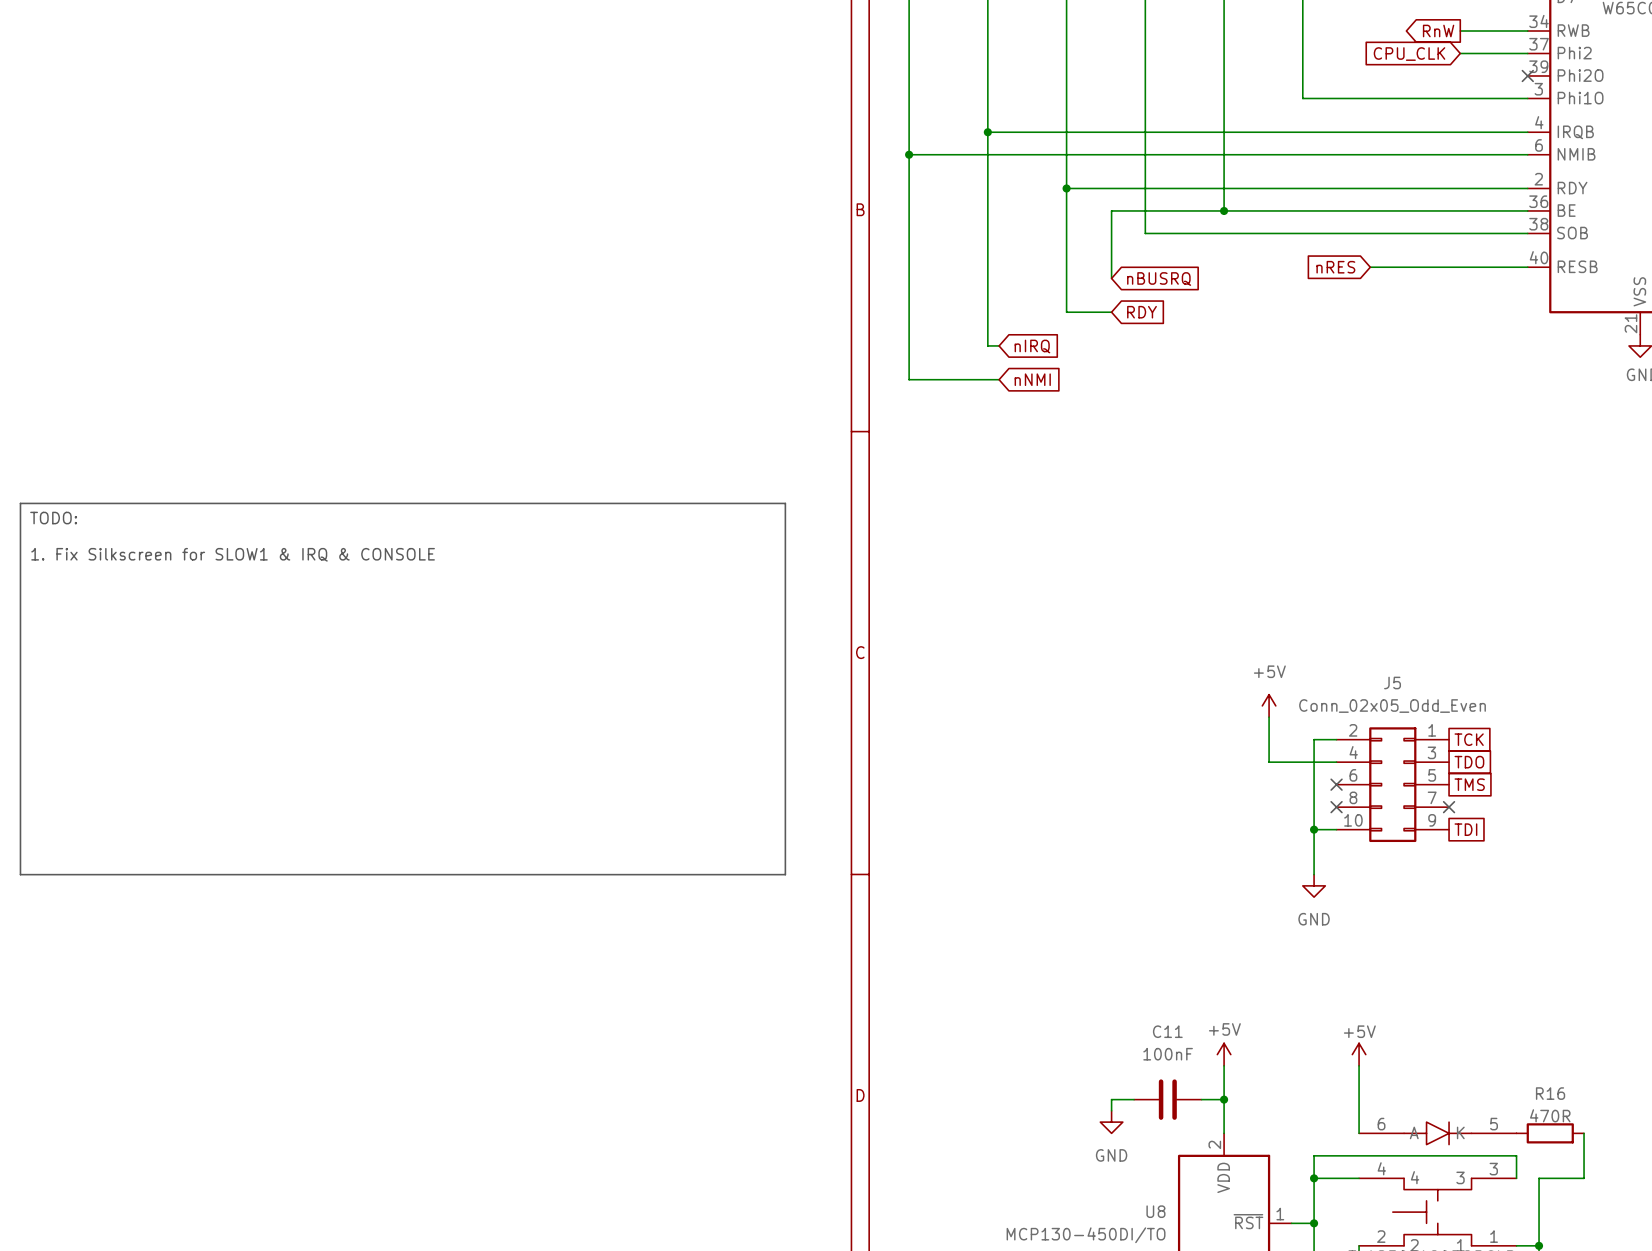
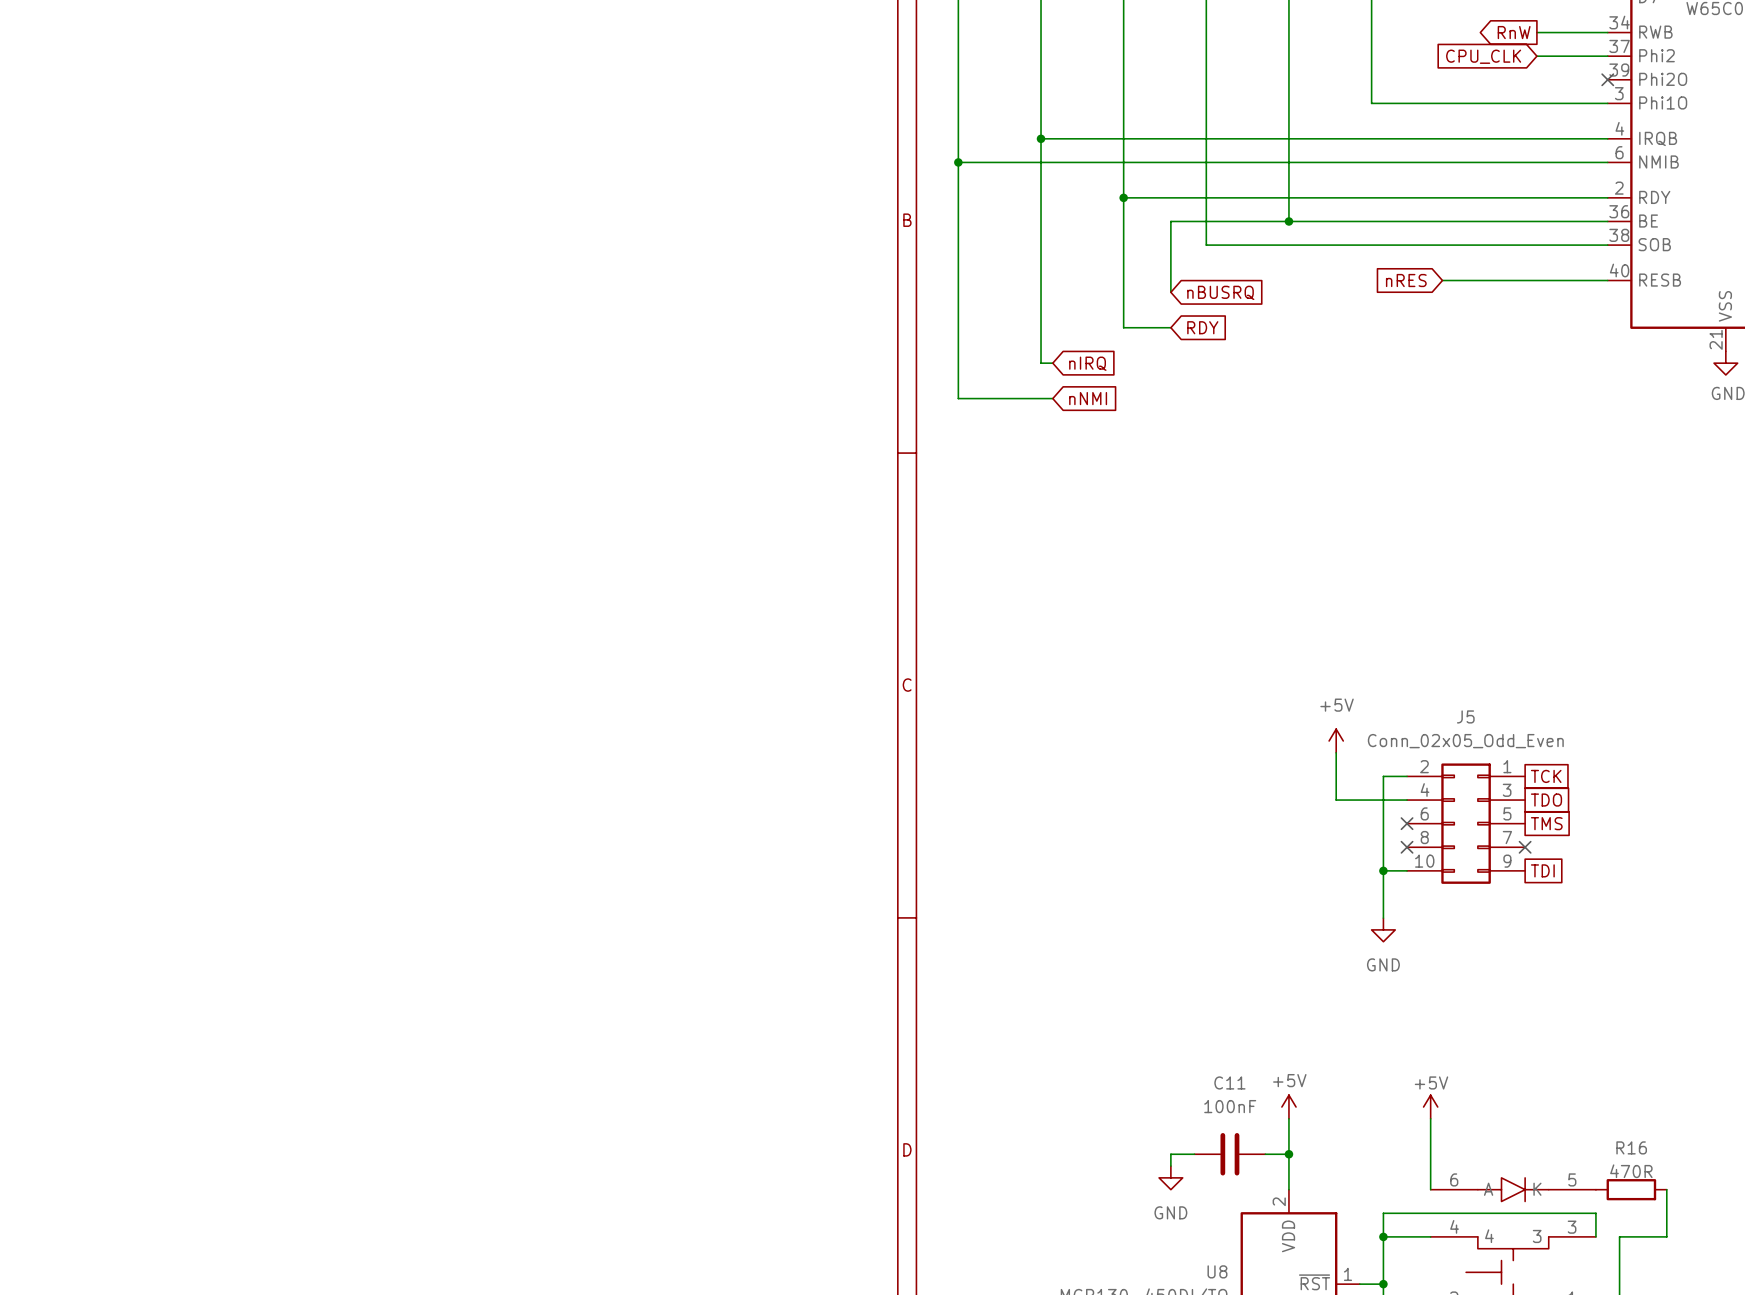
line: (20, 503) (785, 503) (785, 874) (20, 874) (20, 503) -> none
text: TODO: (53, 518) -> none
text: 1. Fix Silkscreen for SLOW1 & IRQ & CONSOLE (233, 554) -> none

